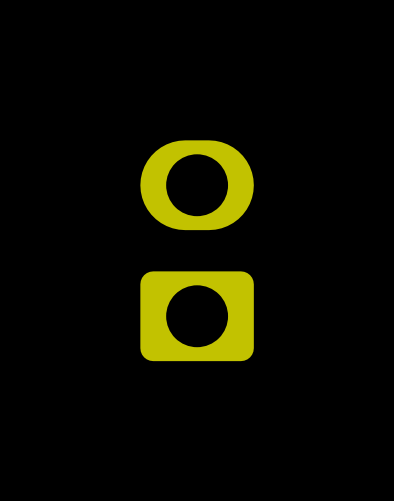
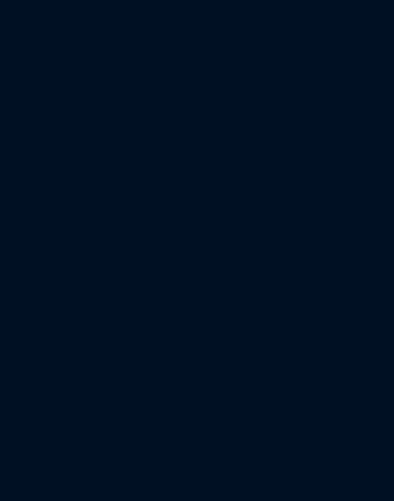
part: (197, 250) -> none

